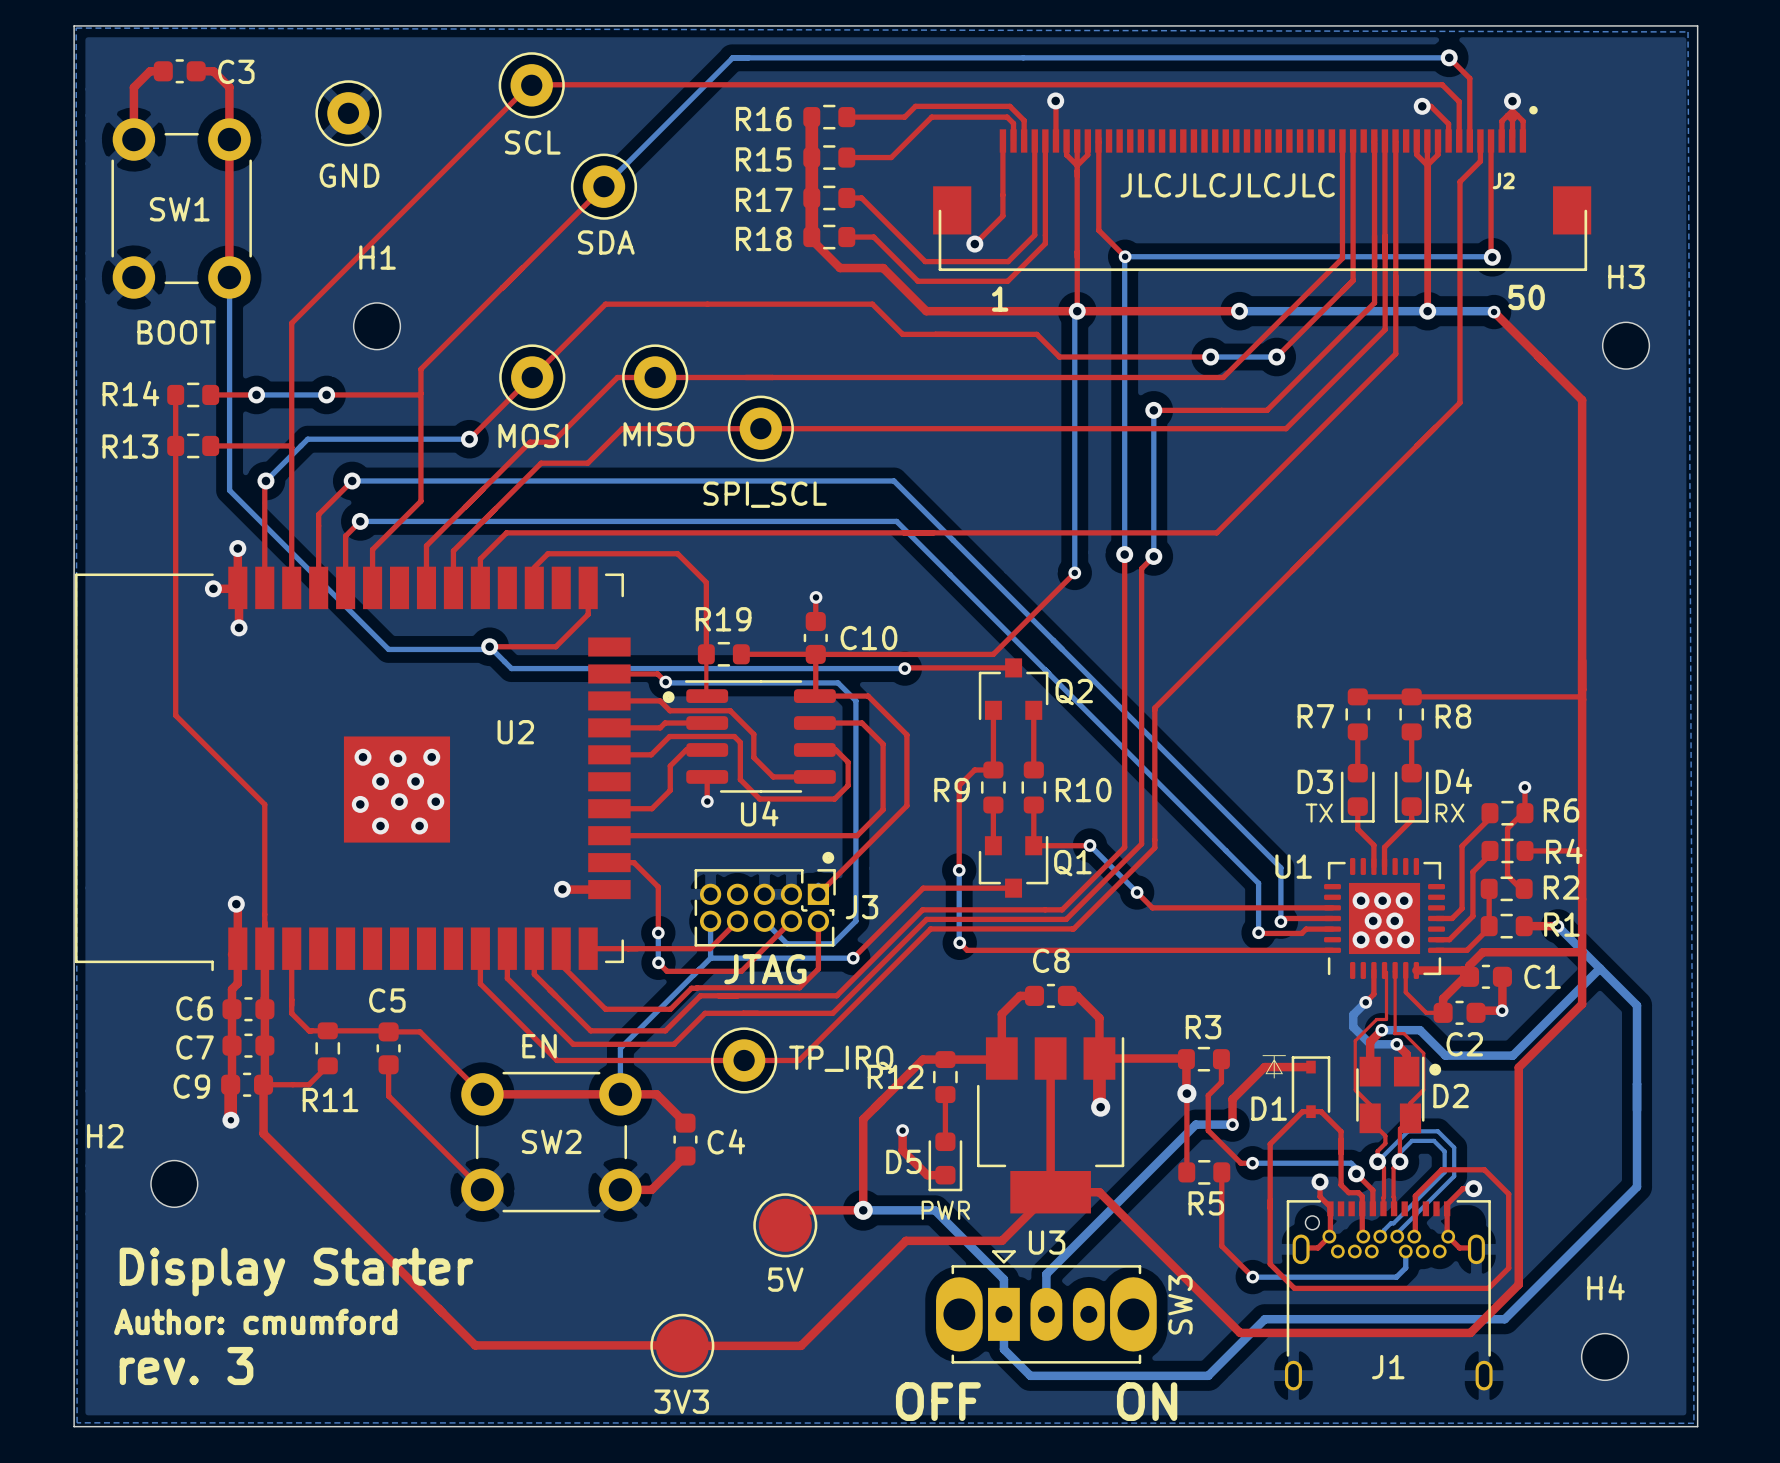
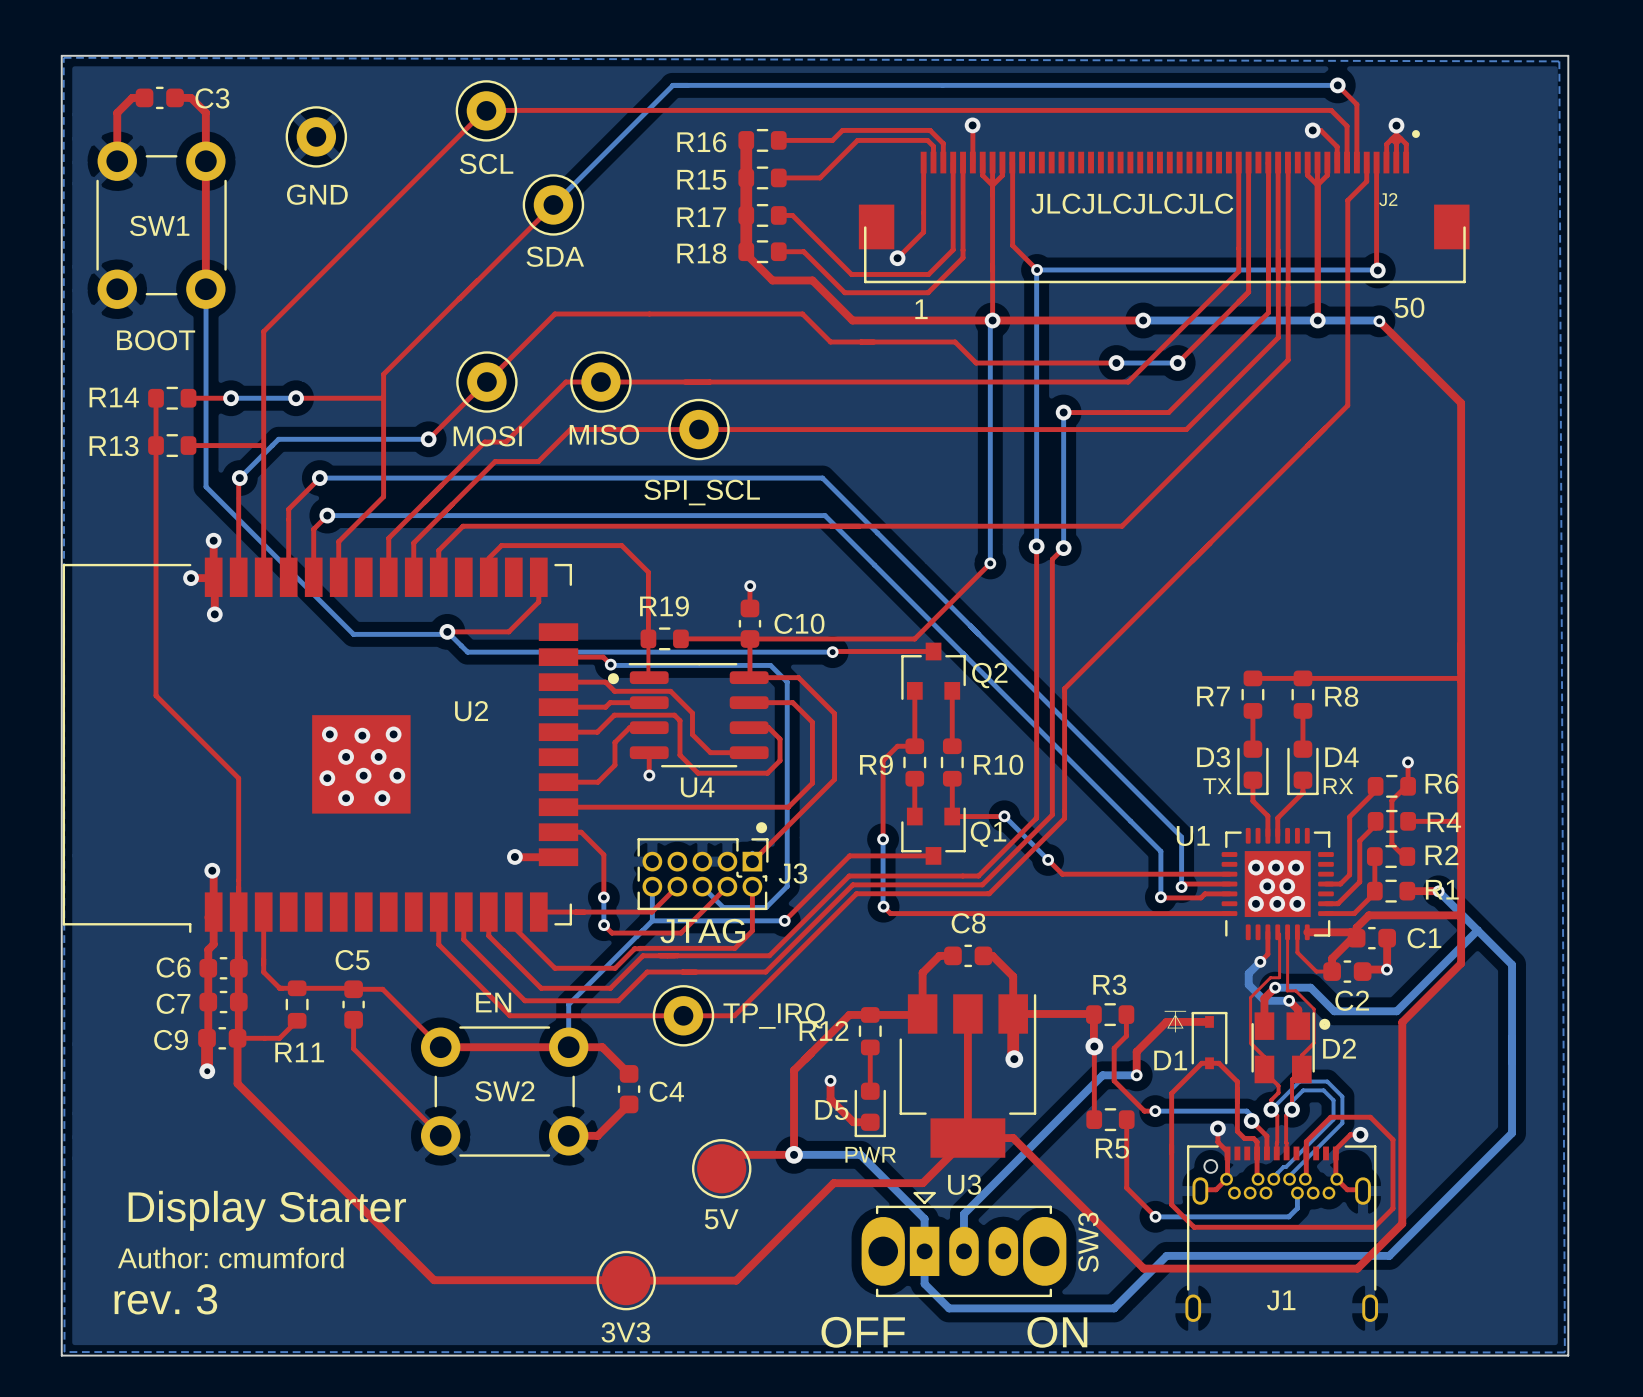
H1: (377, 326) -> none
H3: (1626, 345) -> none
H2: (174, 1183) -> none
H4: (1605, 1356) -> none

